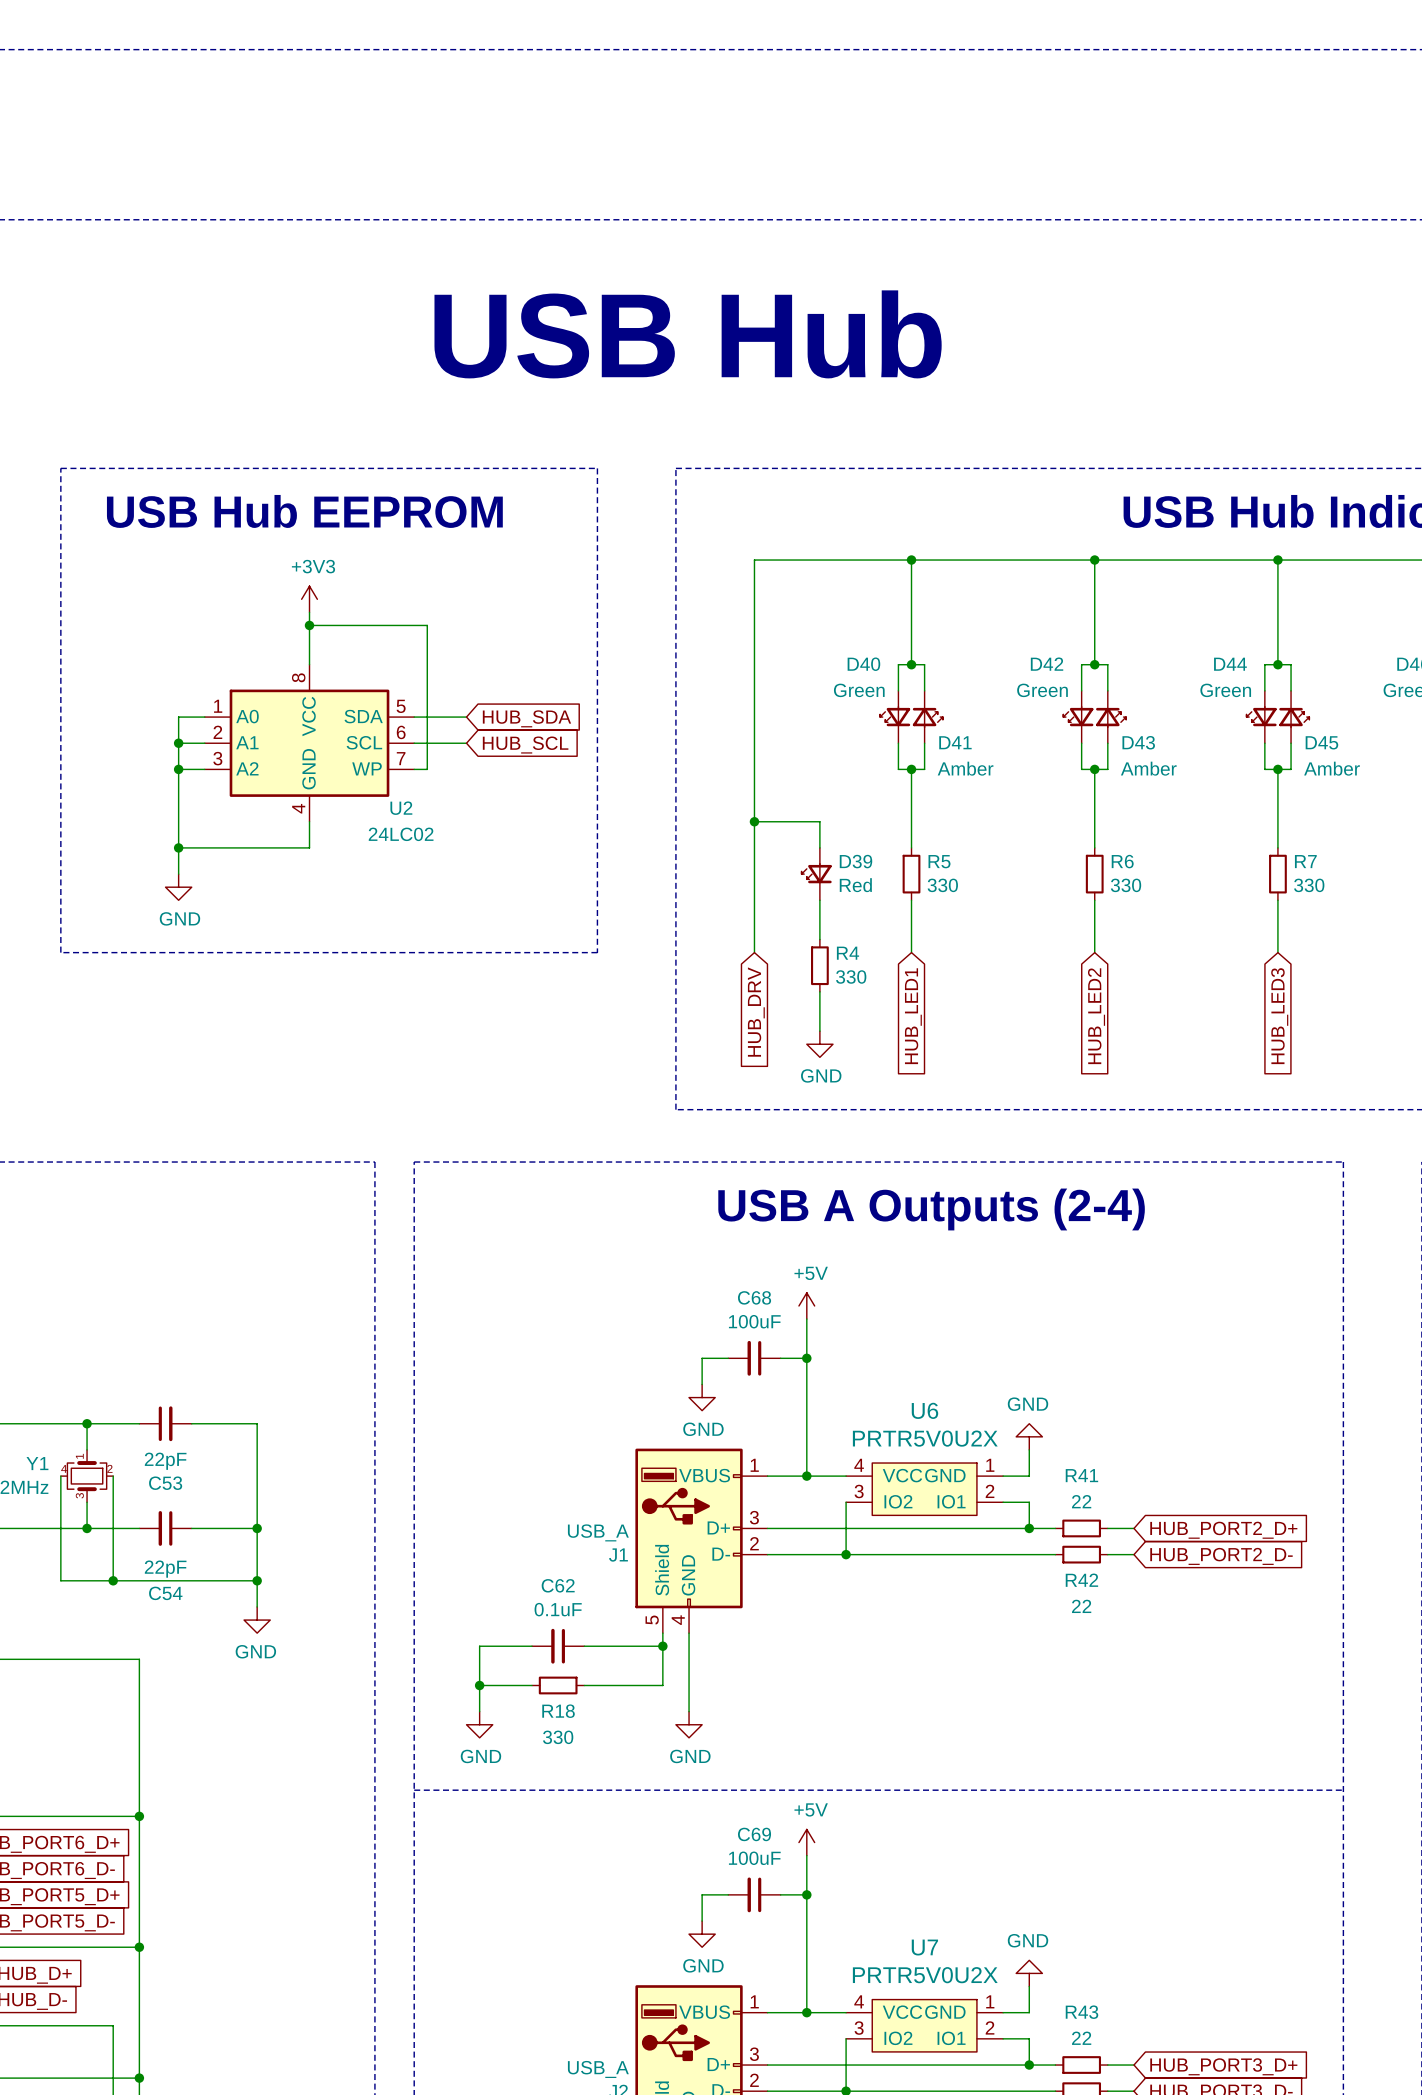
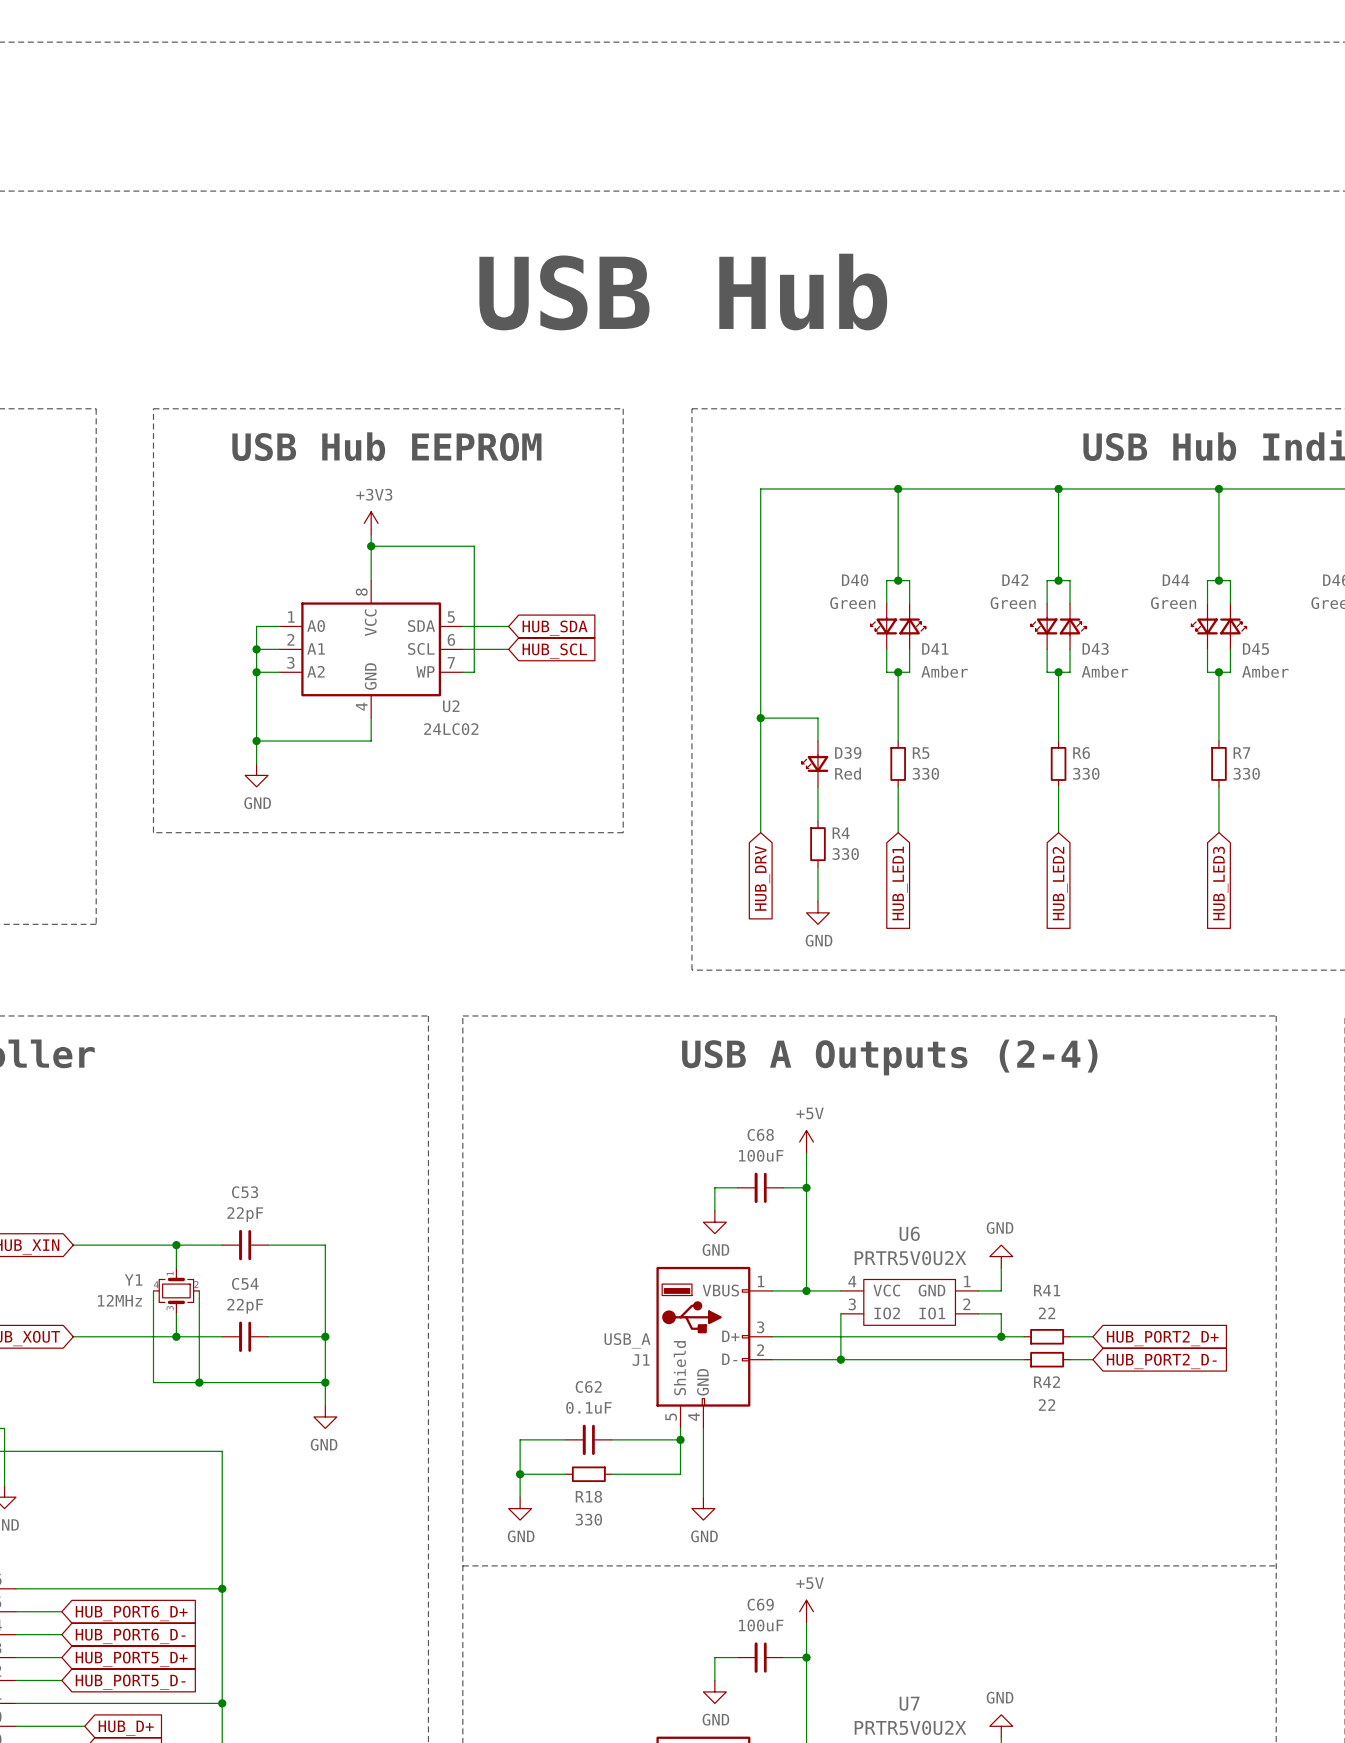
C53 rotation: 0° (165, 1423) -> 180° (245, 1245)
C54 value position: 22pF (165, 1569) -> 22pF (245, 1306)
C54 name position: C54 (165, 1593) -> C54 (245, 1283)

